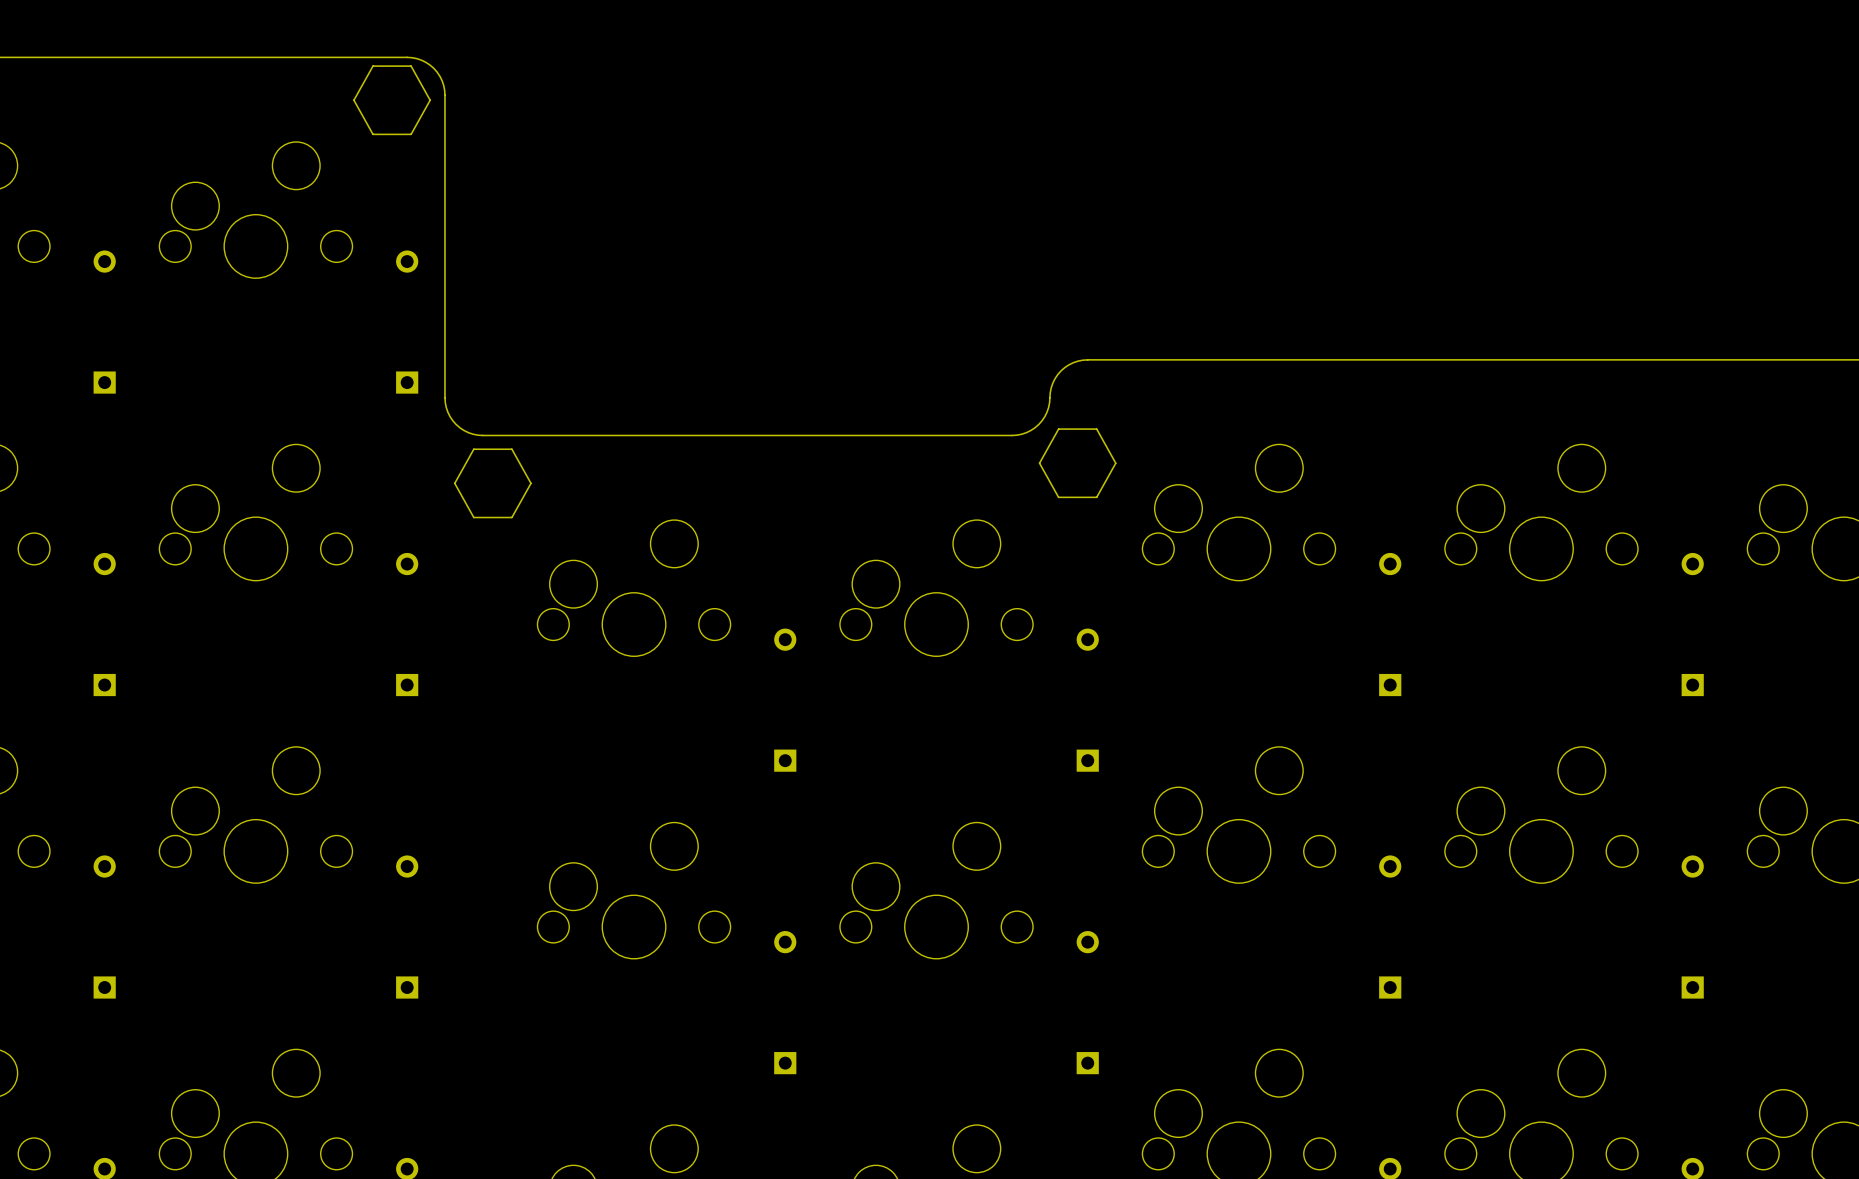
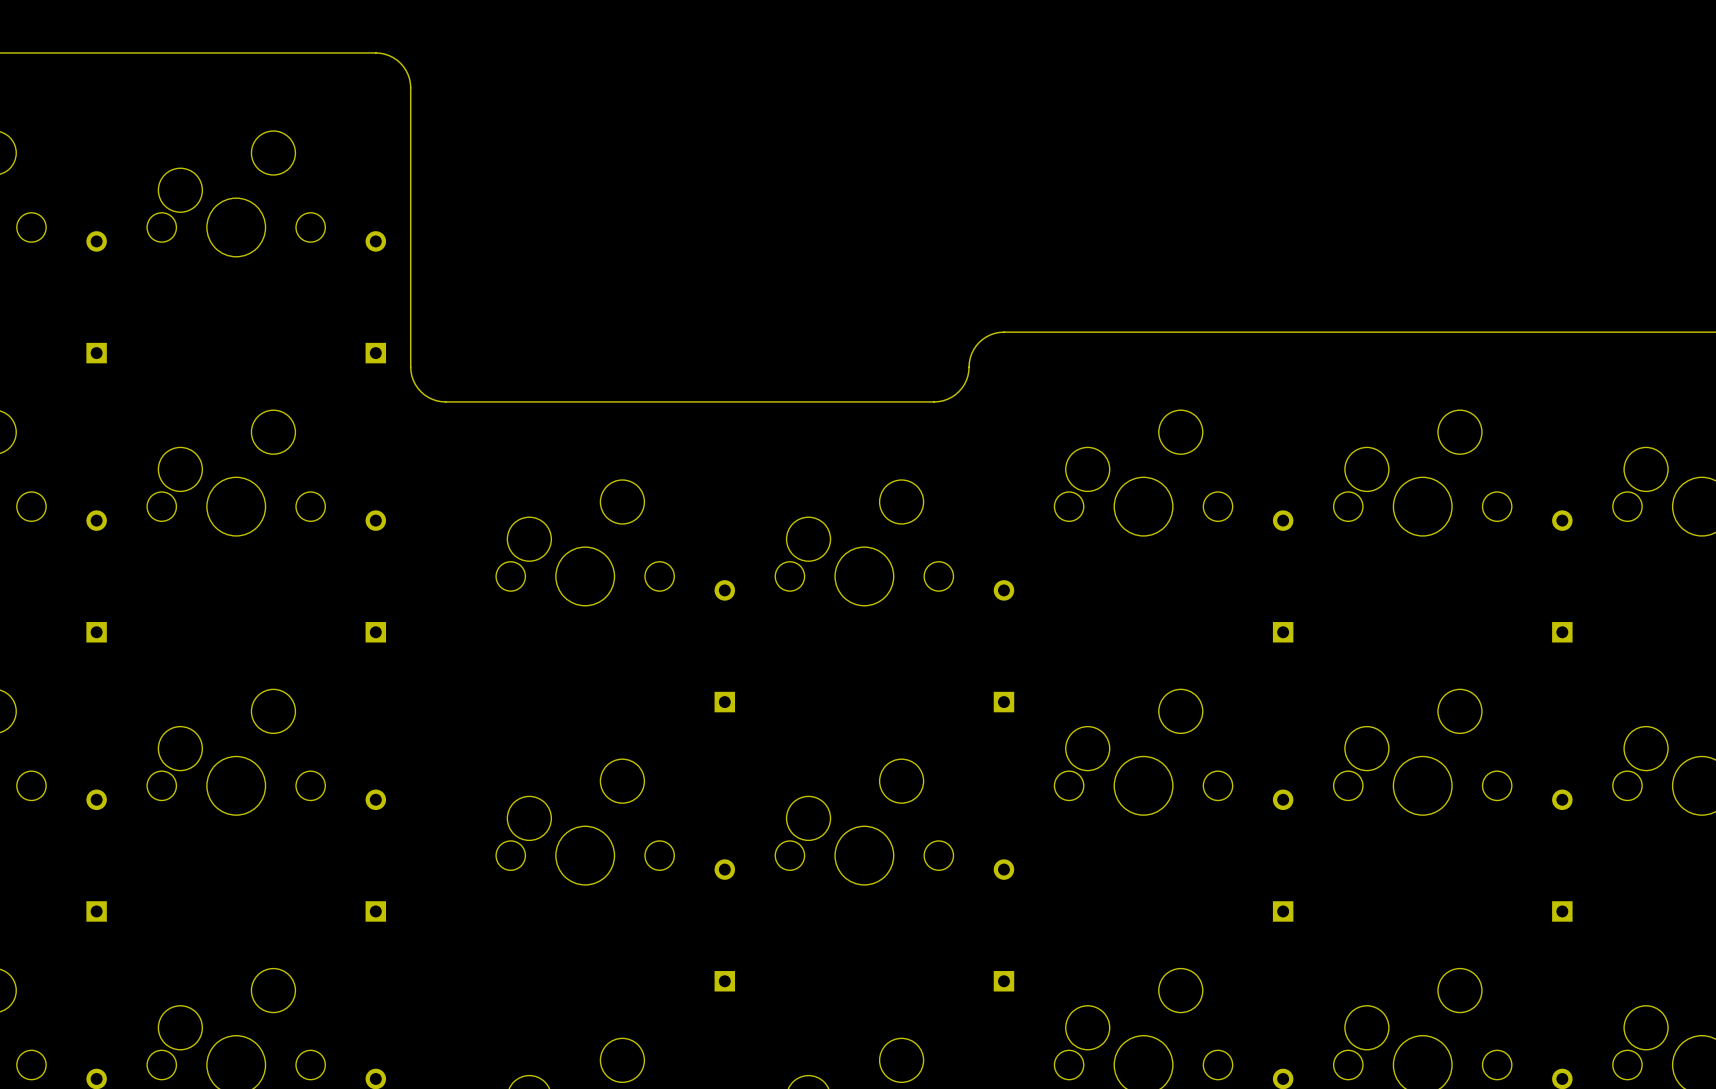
drawing: [353, 65, 431, 136] -> none
drawing: [1038, 428, 1117, 499] -> none
drawing: [453, 448, 532, 519] -> none

